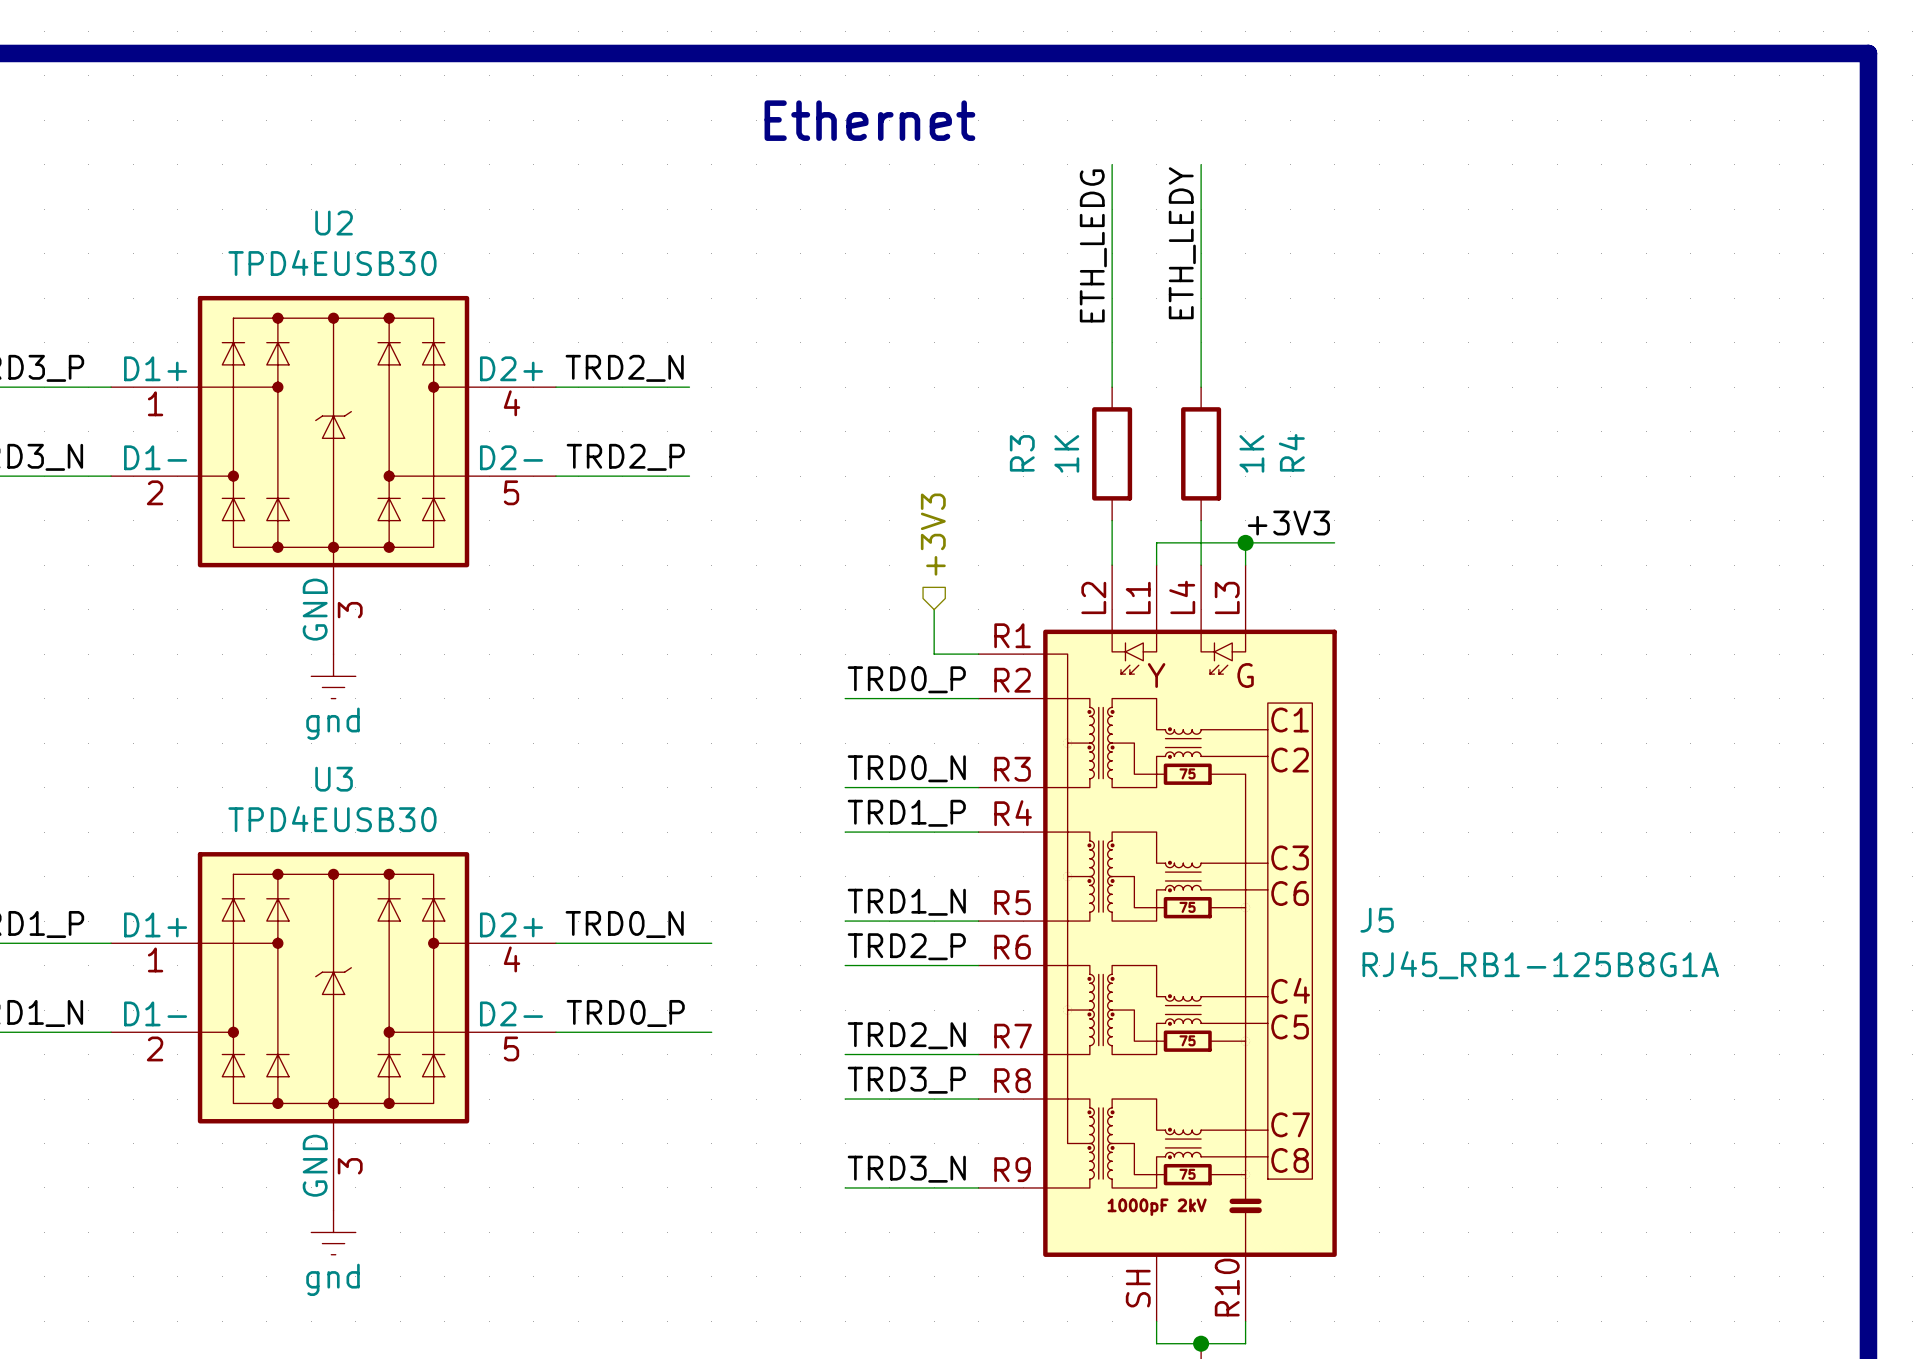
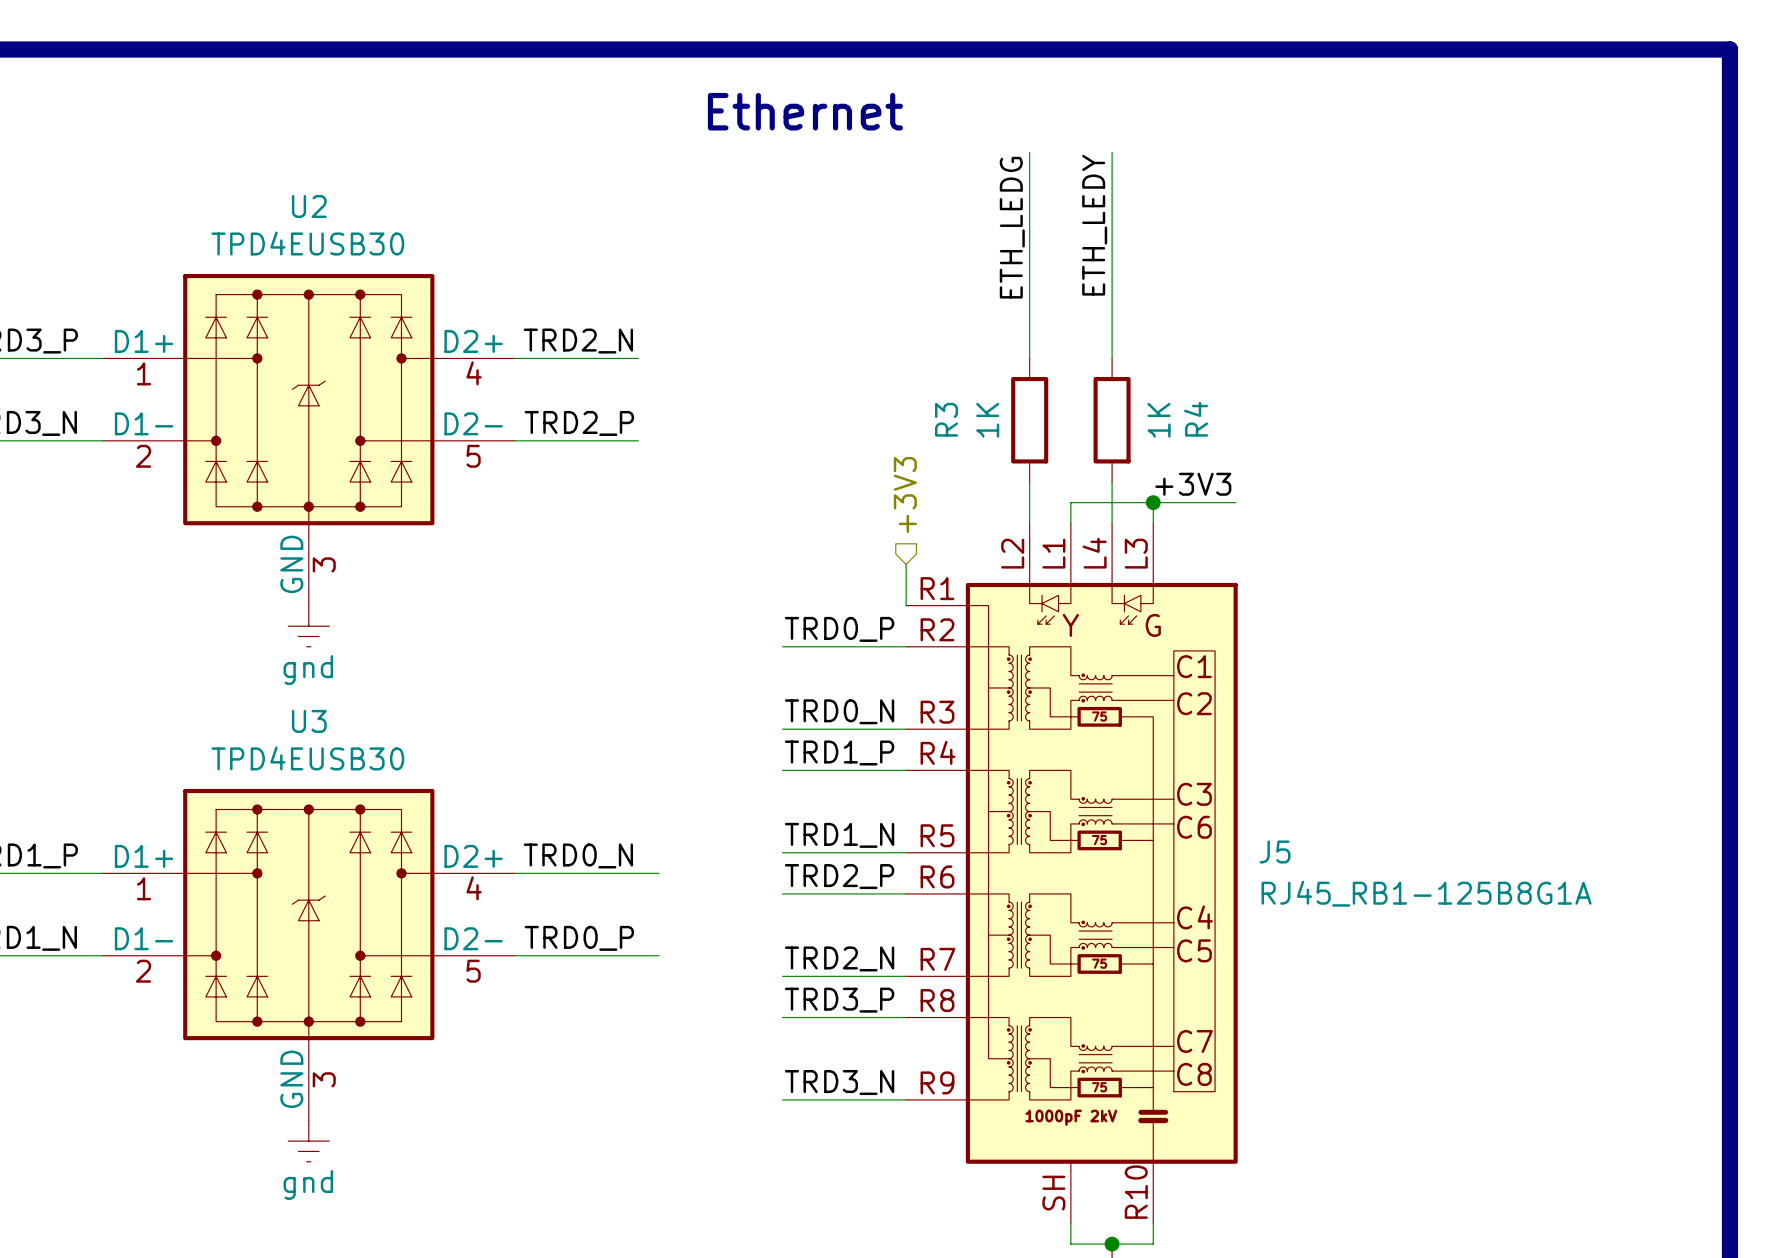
hierarchical label position: +3V3 (933, 534) -> +3V3 (905, 494)
wire: (934, 609) (934, 654) (978, 654) -> (906, 564) (906, 605)

